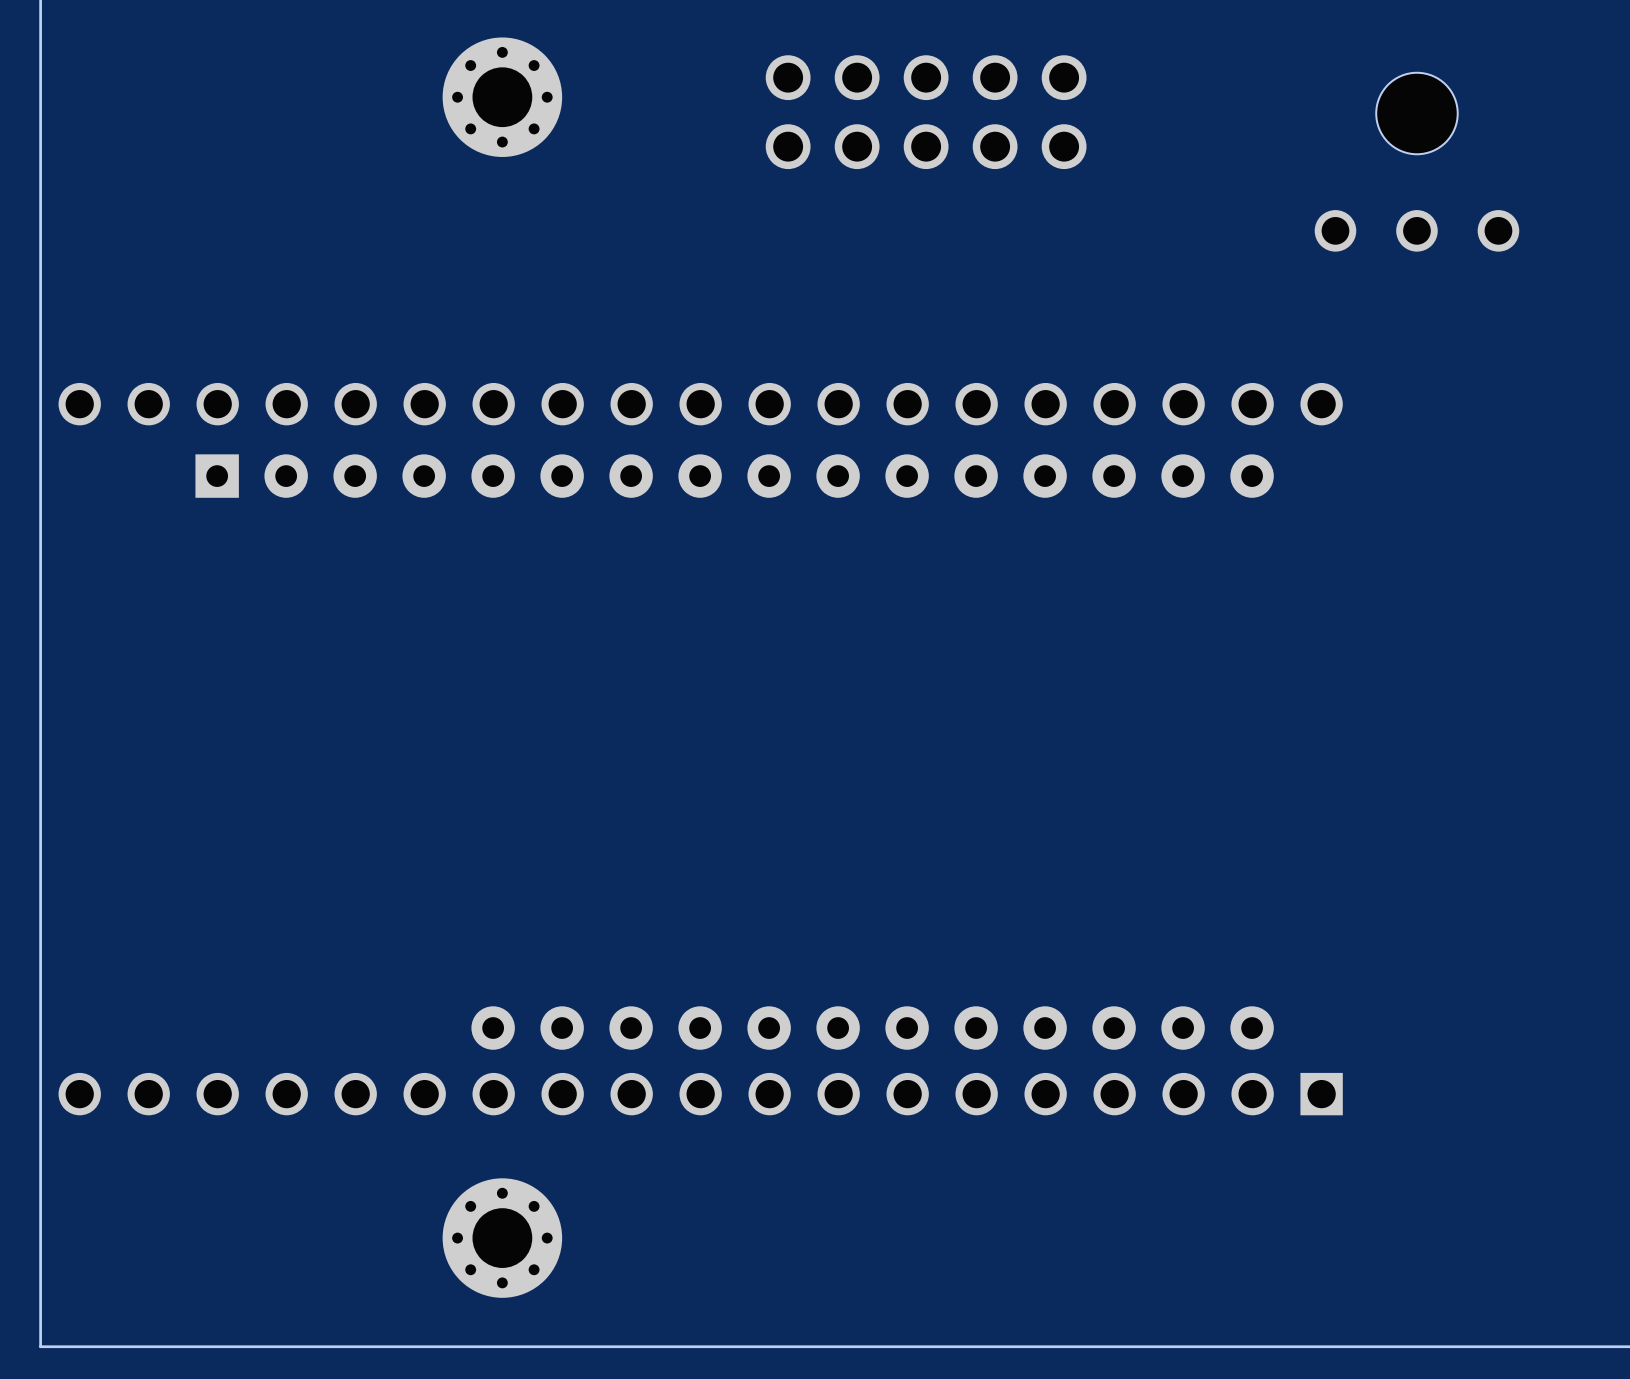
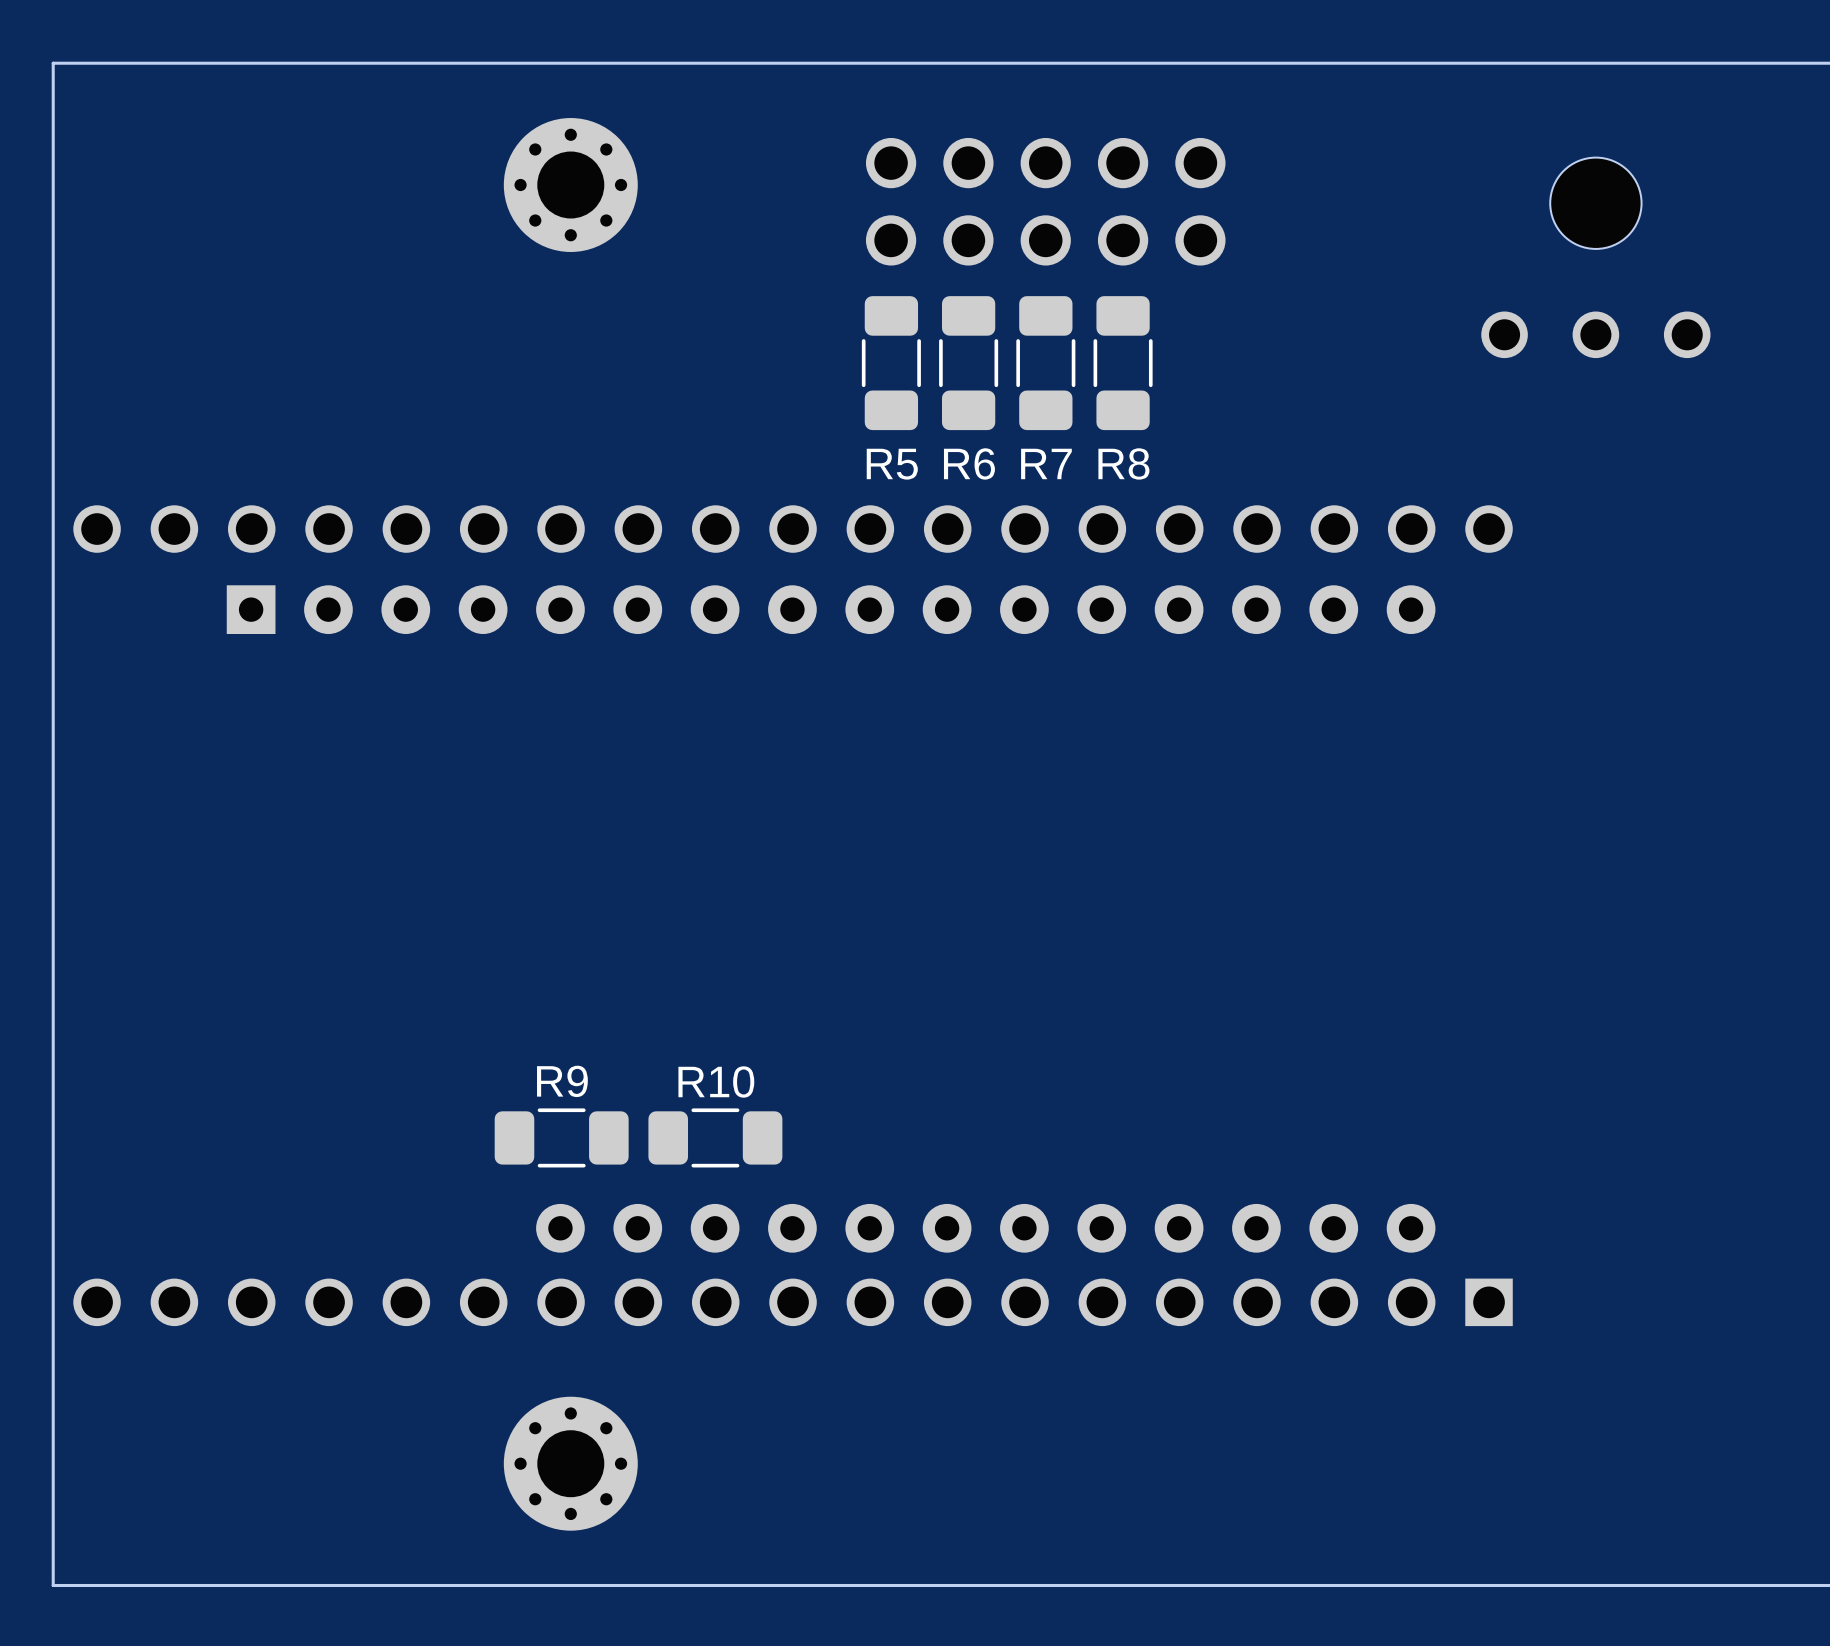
R5: none -> (891, 363)
R6: none -> (968, 363)
R7: none -> (1045, 363)
R8: none -> (1123, 363)
R9: none -> (561, 1137)
R10: none -> (715, 1137)

